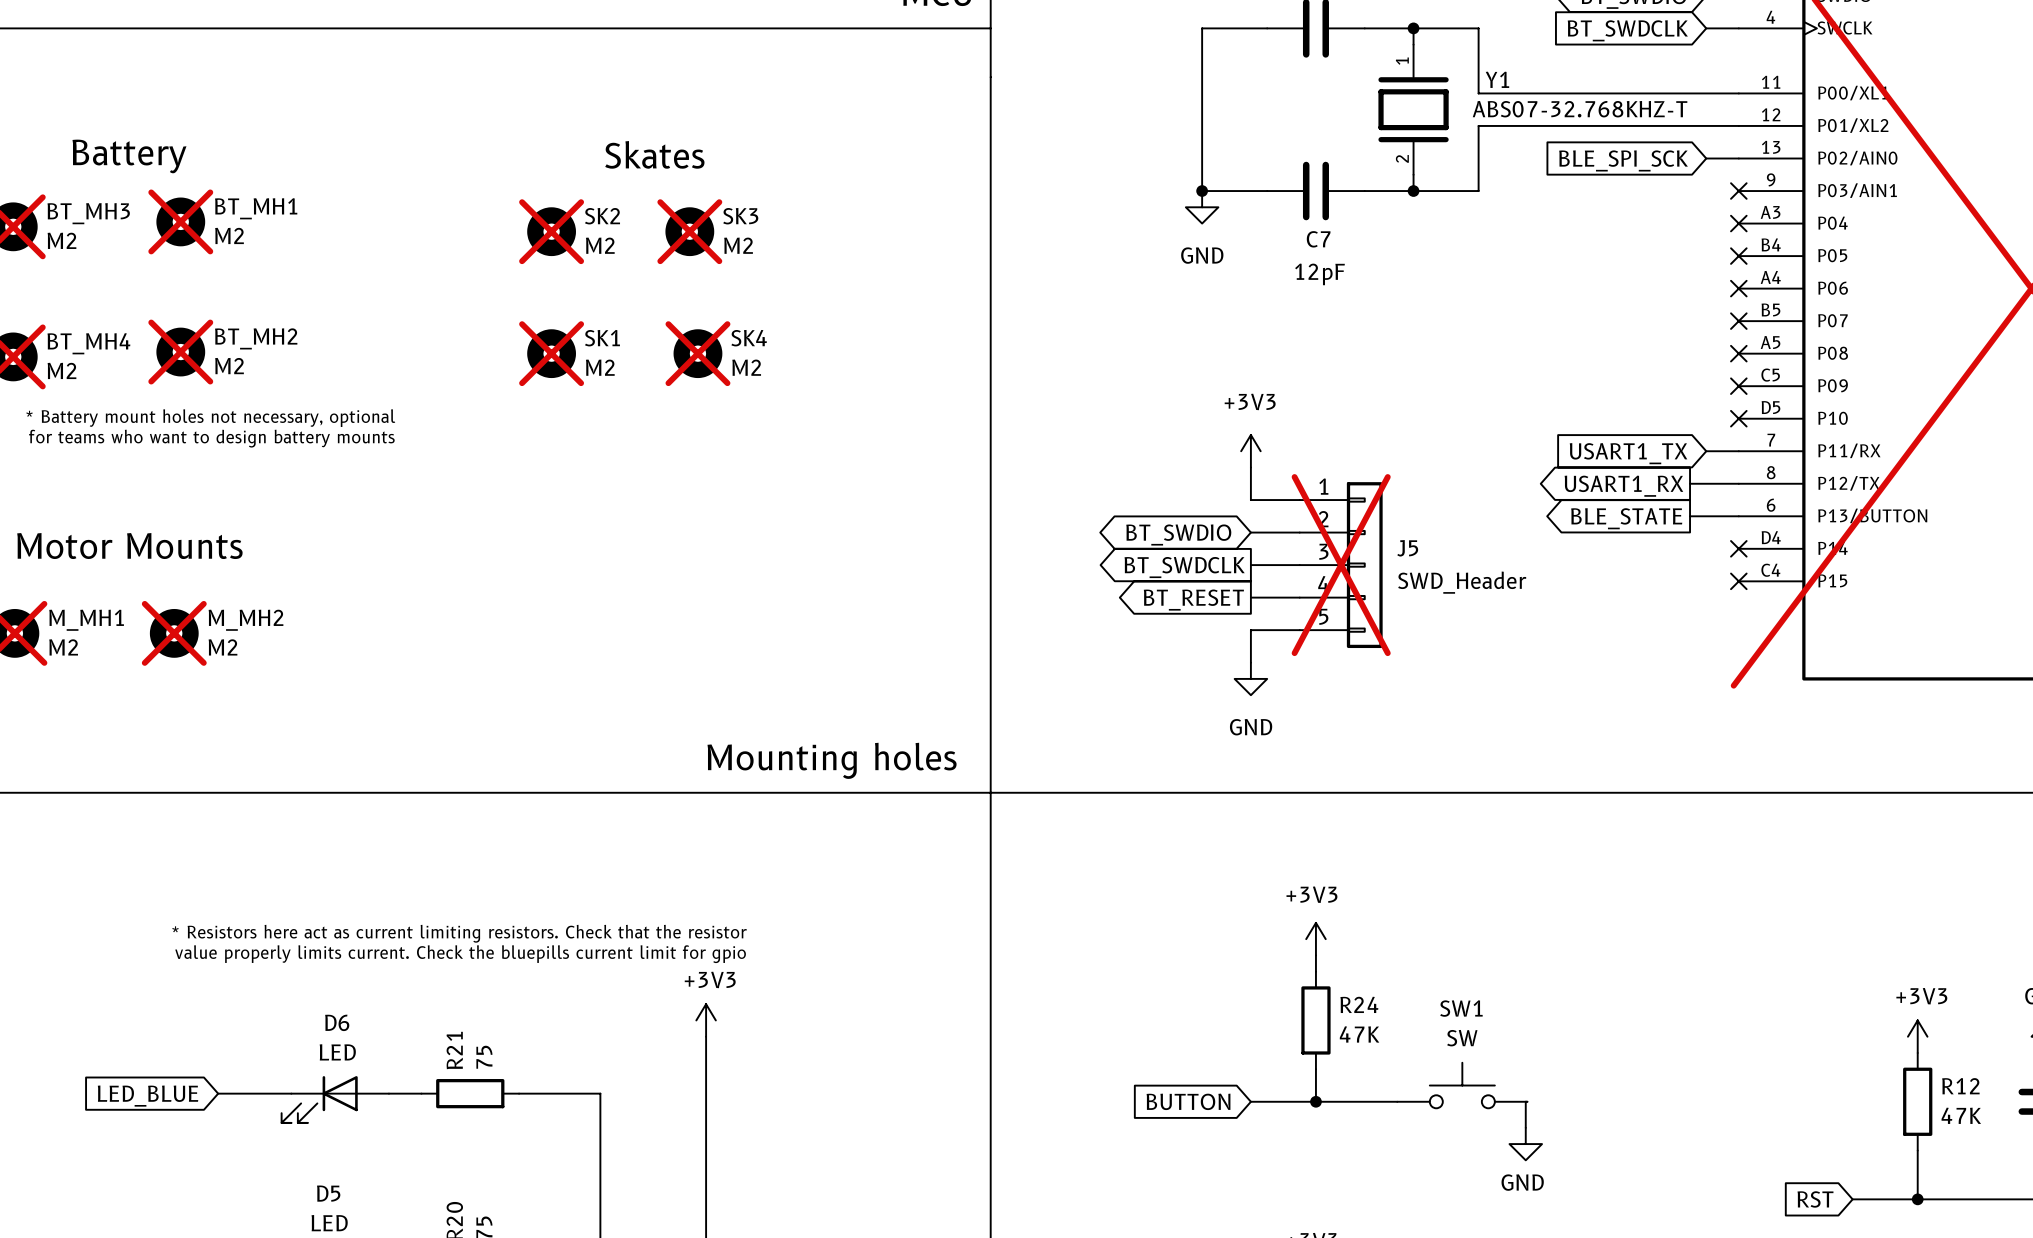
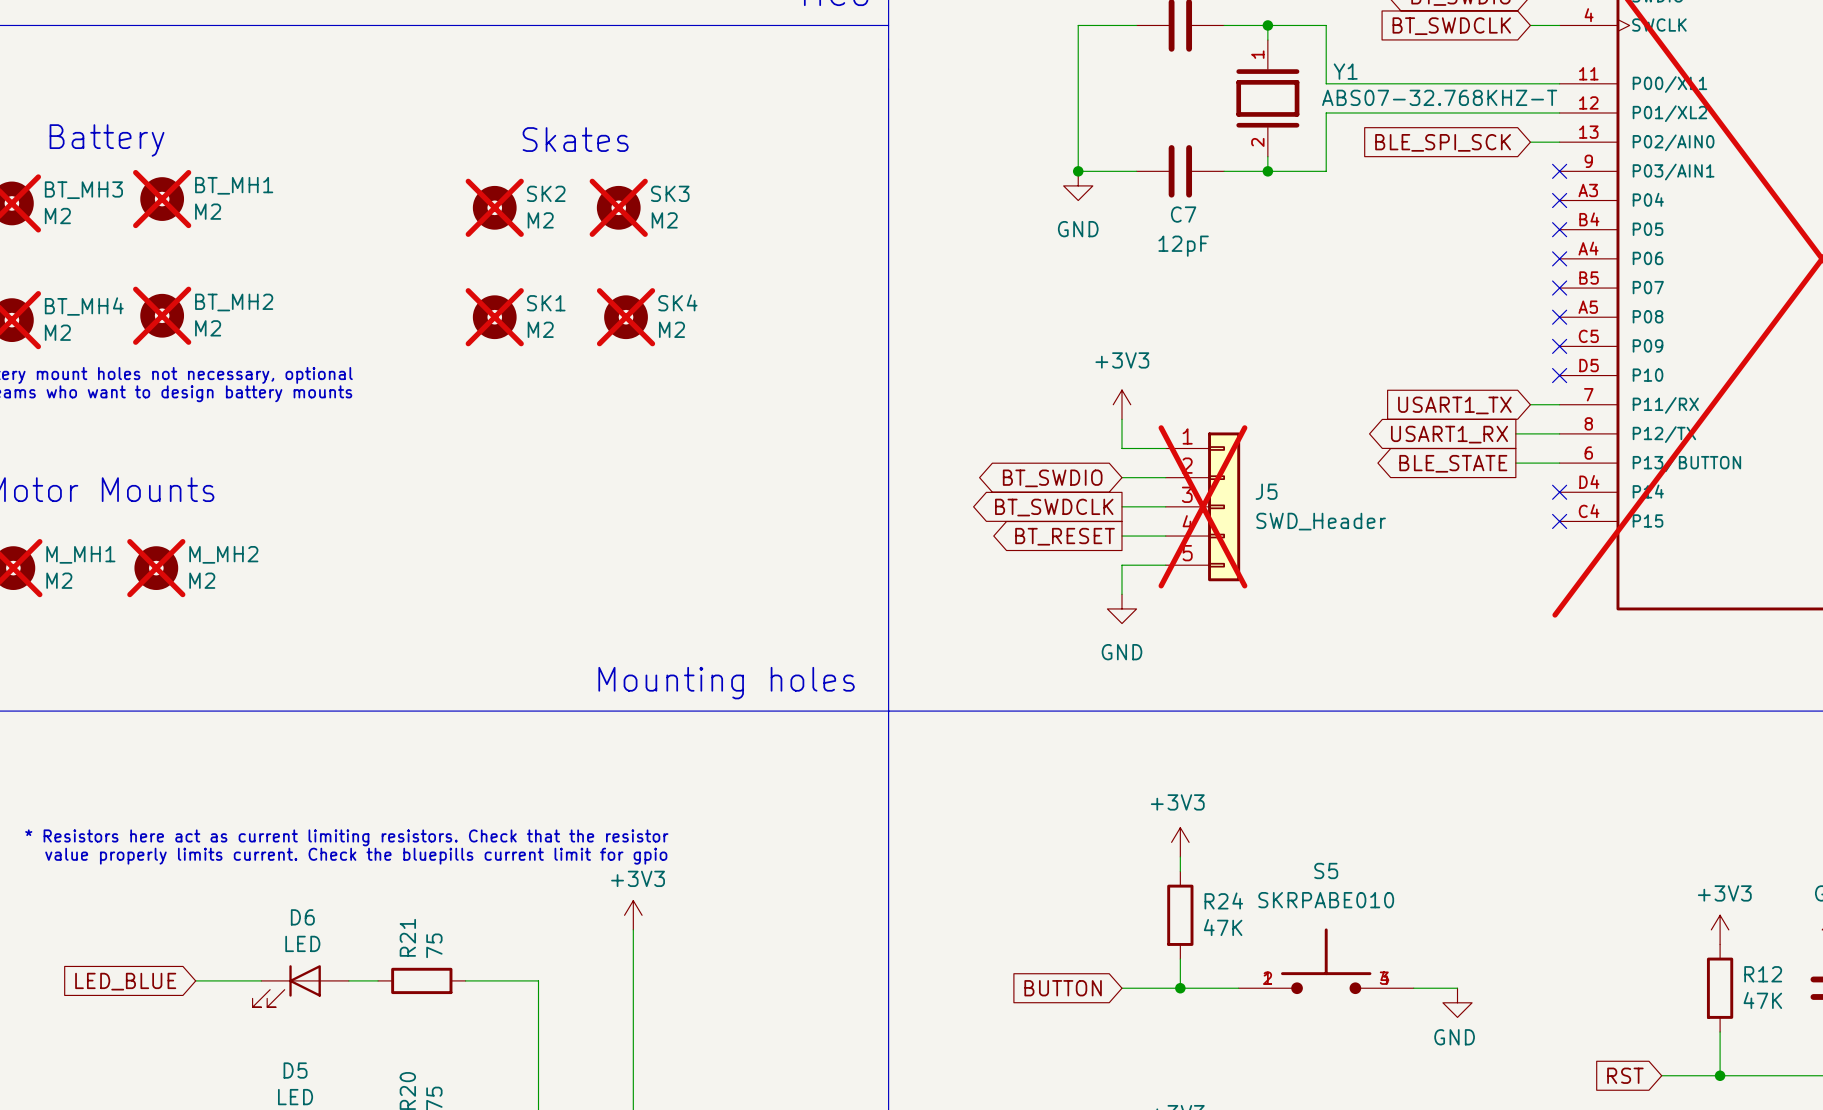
S5: none -> SKRPABE010 (1326, 961)
SW1: SW (1462, 1085) -> none
wire: (1527, 1101) (1525, 1101) (1525, 1127) -> none
wire: none -> (1413, 988) (1457, 988)
power symbol position: GND (1525, 1144) -> GND (1457, 1002)

